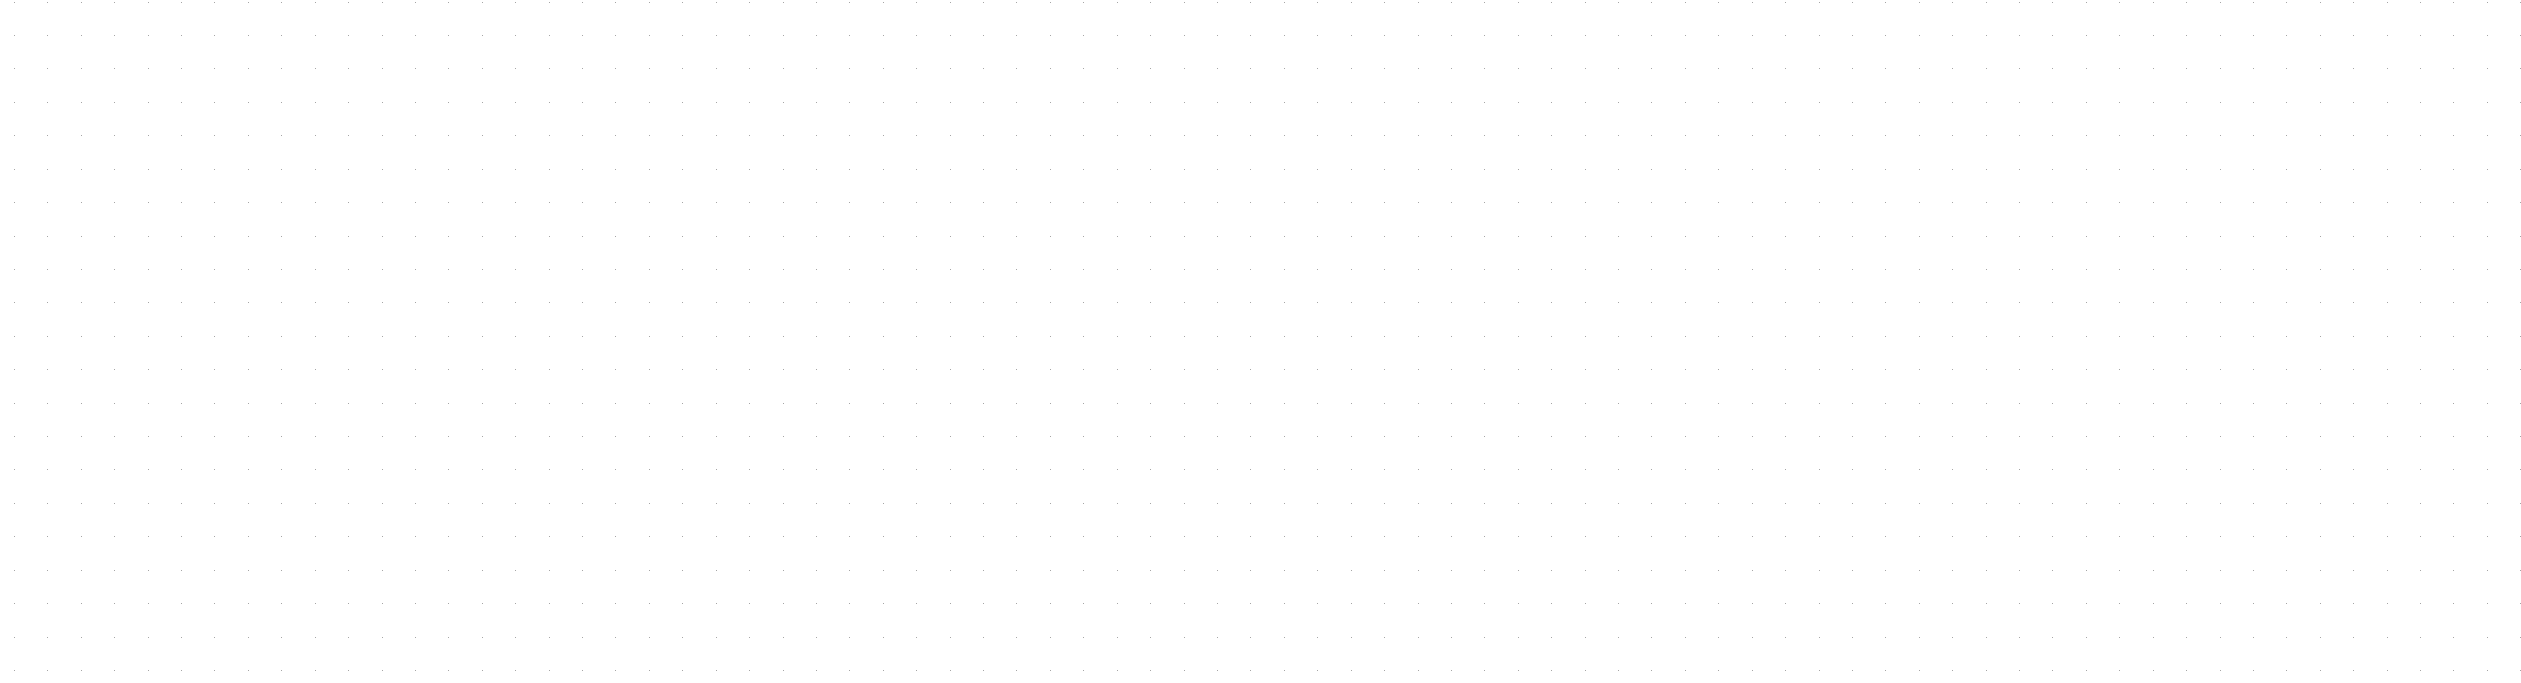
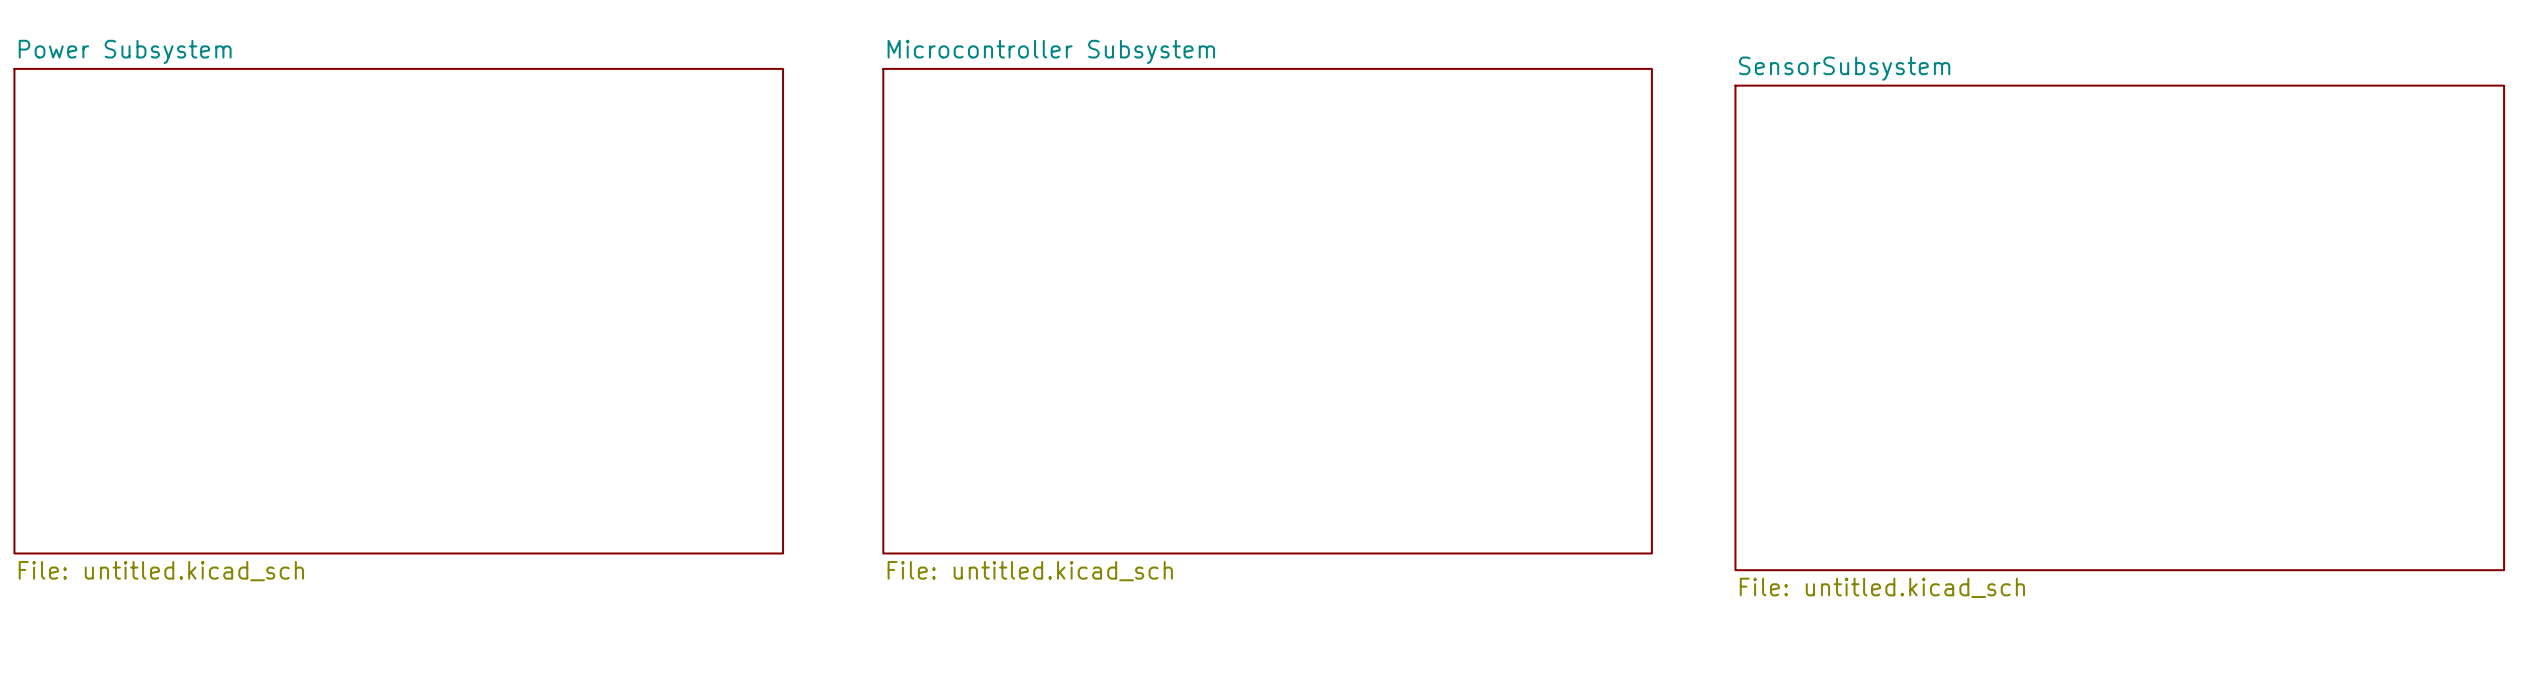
sheet Power Subsystem: none -> File: untitled.kicad_sch (398, 311)
sheet Microcontroller Subsystem: none -> File: untitled.kicad_sch (1267, 311)
sheet SensorSubsystem: none -> File: untitled.kicad_sch (2119, 327)

